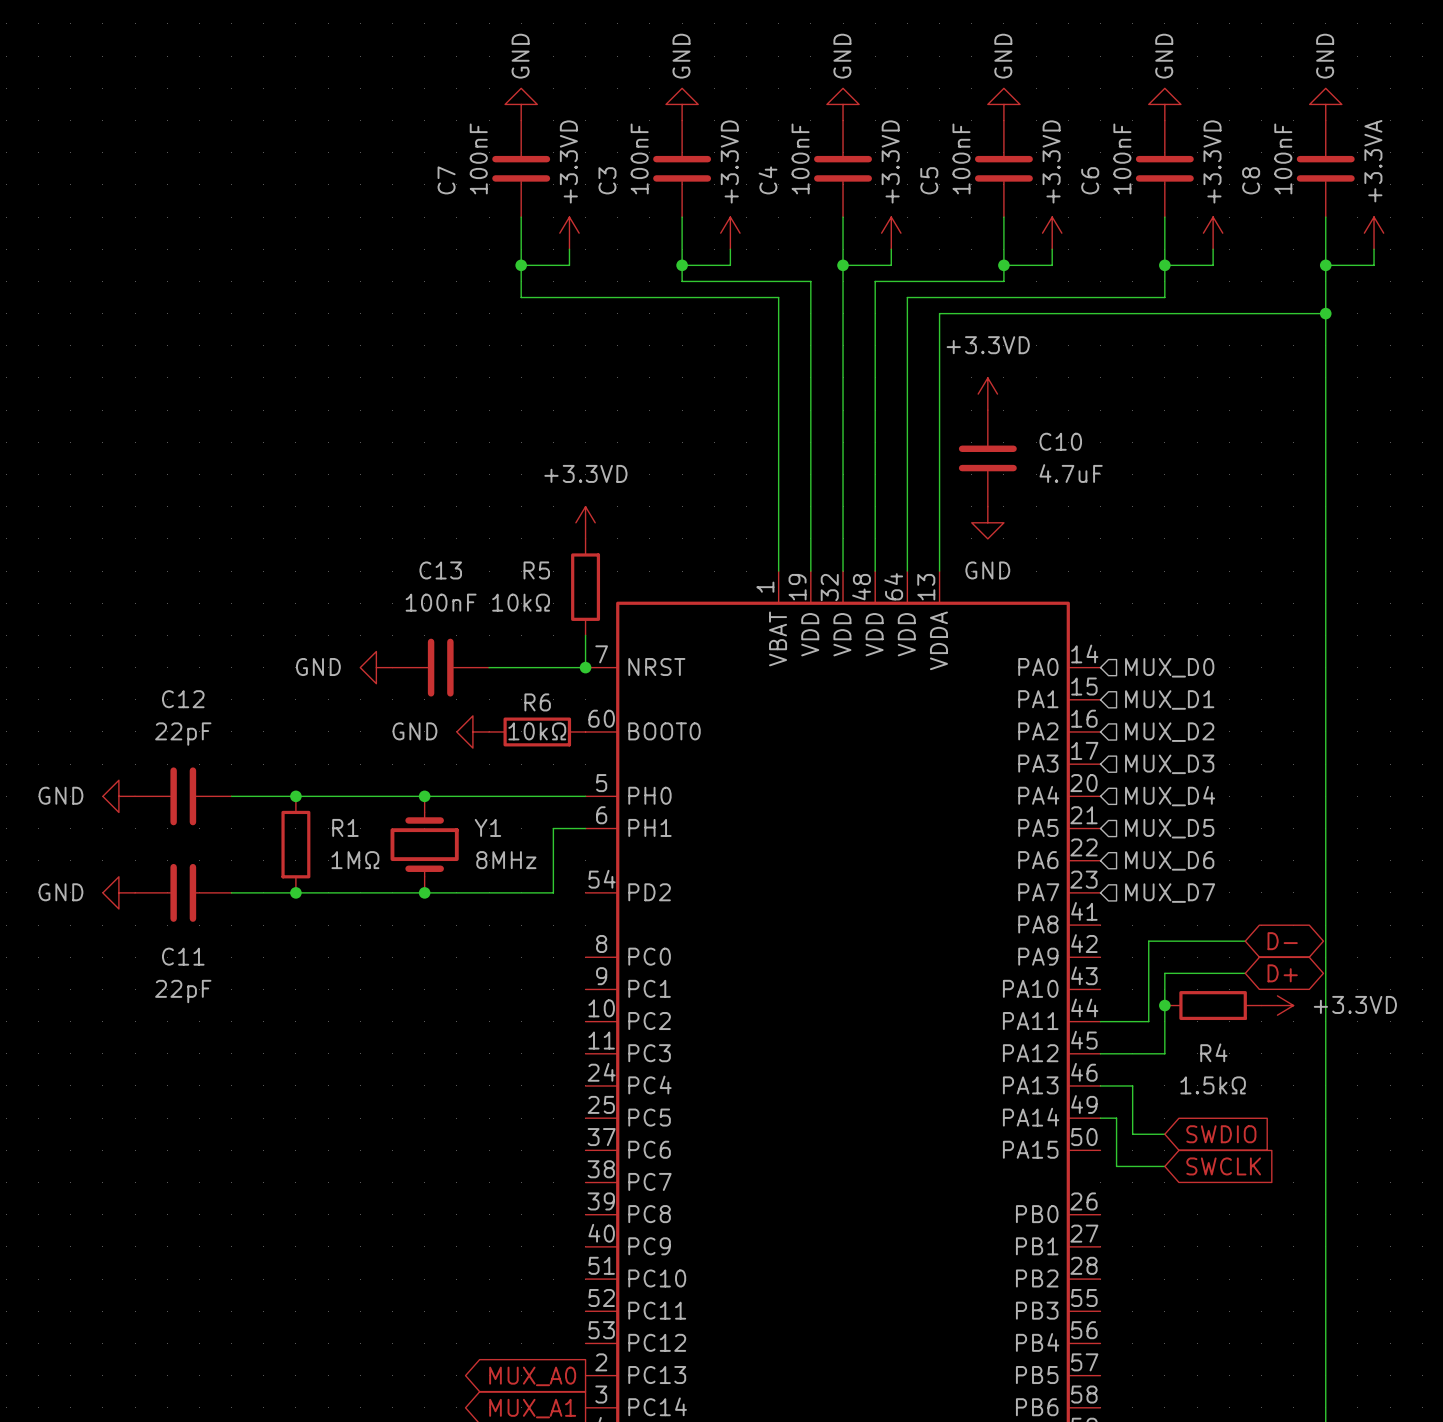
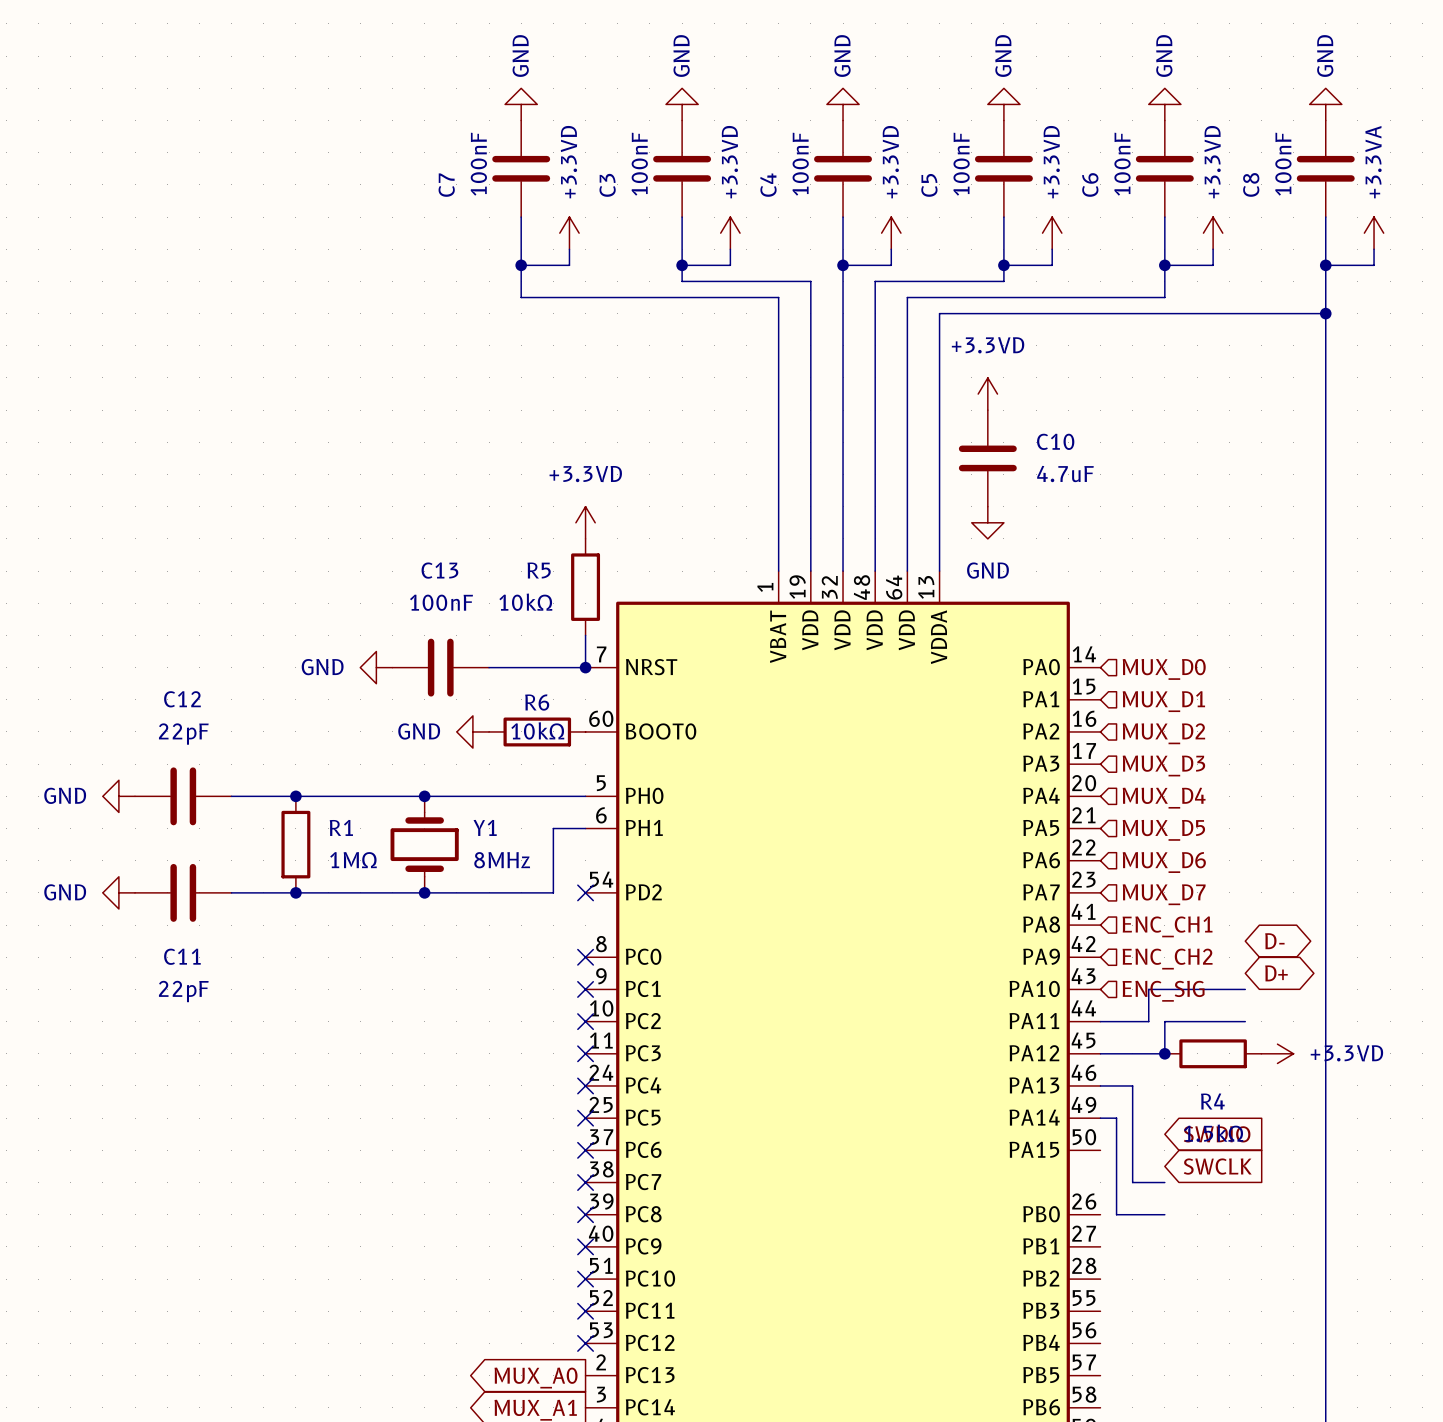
no-connect mark: none -> (585, 892)
hierarchical label: none -> ENC_CH1 (1167, 926)
wire: (1245, 941) (1148, 941) (1148, 989) -> (1245, 989) (1148, 989)
no-connect mark: none -> (585, 957)
hierarchical label: none -> ENC_CH2 (1167, 959)
wire: (1245, 973) (1164, 973) (1164, 1021) -> (1245, 1021) (1164, 1021)
no-connect mark: none -> (585, 989)
hierarchical label: none -> ENC_SIG (1163, 991)
junction position: (1164, 1005) -> (1164, 1053)
R4 position: (1213, 1005) -> (1213, 1053)
power symbol position: +3.3VD (1277, 1005) -> +3.3VD (1277, 1053)
no-connect mark: none -> (585, 1021)
no-connect mark: none -> (585, 1053)
no-connect mark: none -> (585, 1085)
no-connect mark: none -> (585, 1118)
wire: (1132, 1134) (1164, 1134) -> (1132, 1134) (1132, 1182) (1164, 1182)
no-connect mark: none -> (585, 1150)
wire: (1116, 1166) (1164, 1166) -> (1116, 1166) (1116, 1214) (1164, 1214)
no-connect mark: none -> (585, 1182)
no-connect mark: none -> (585, 1214)
no-connect mark: none -> (585, 1246)
no-connect mark: none -> (585, 1279)
no-connect mark: none -> (585, 1311)
no-connect mark: none -> (585, 1343)

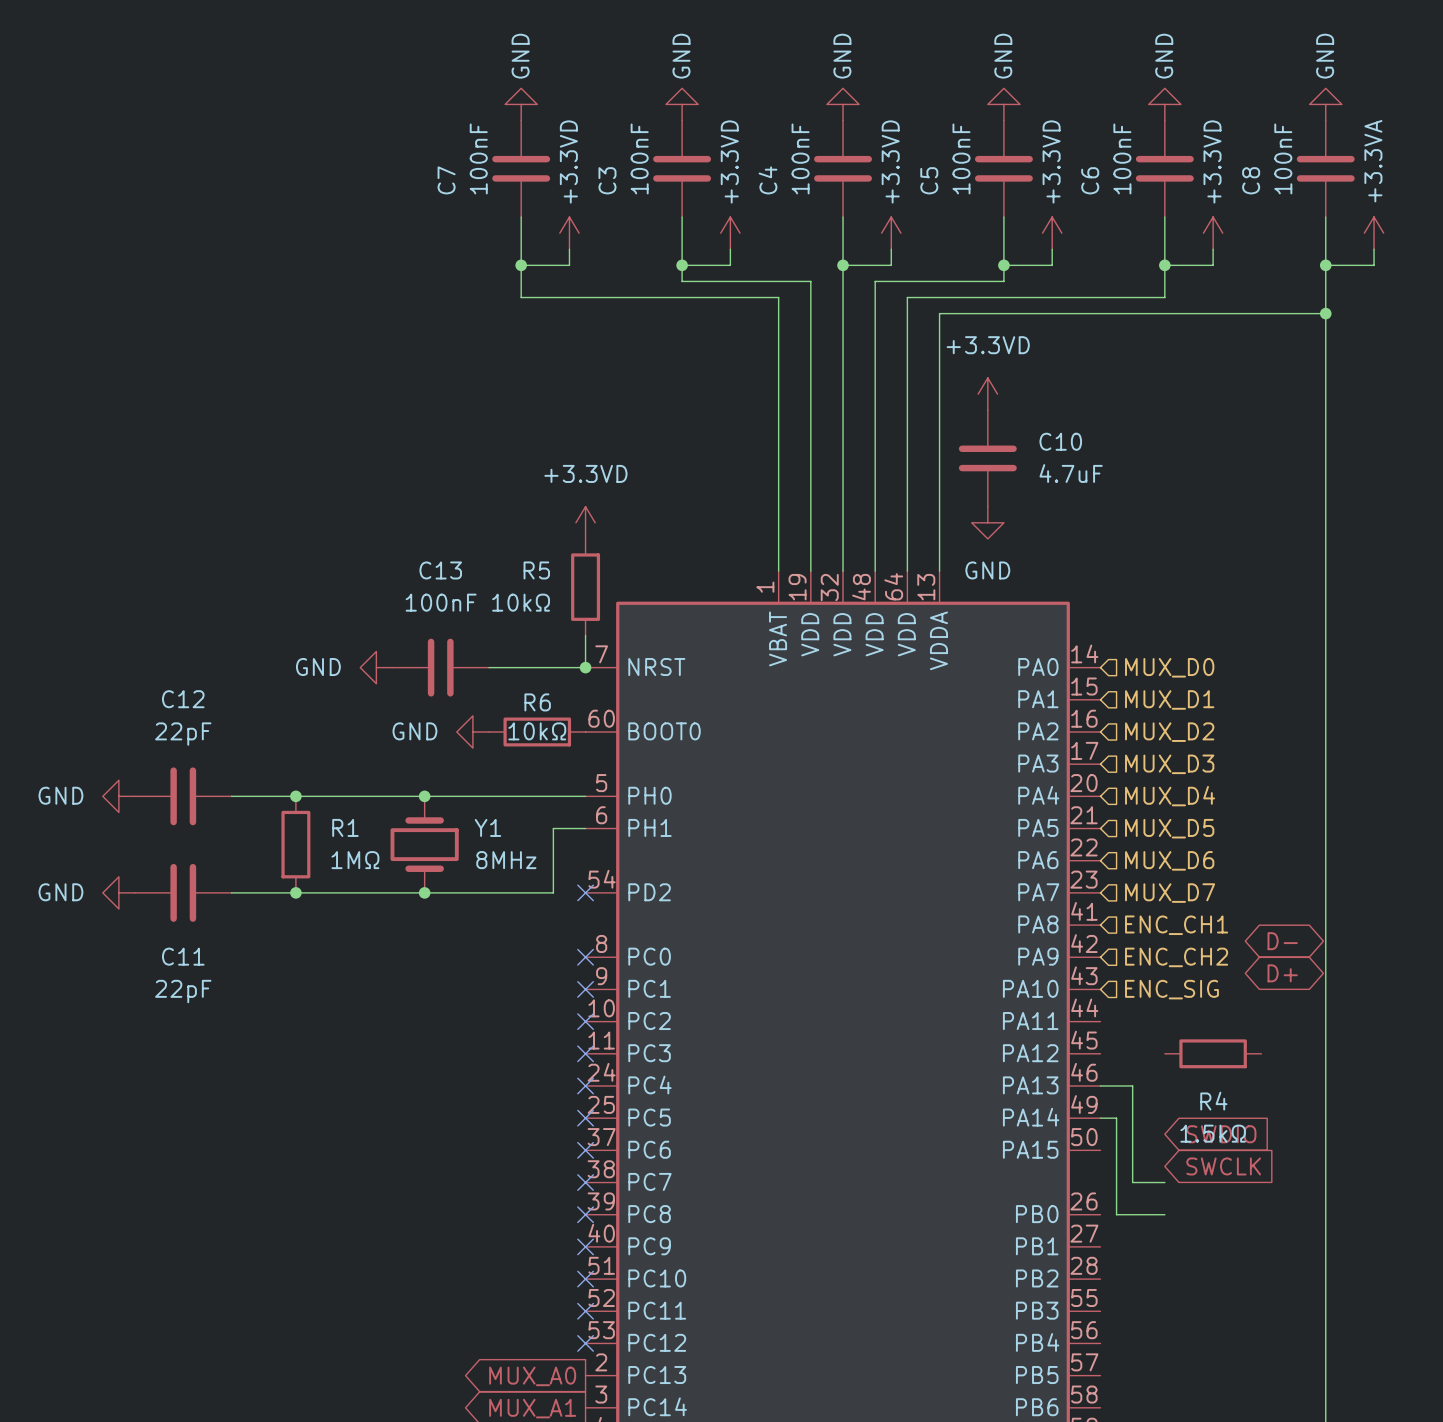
wire: (1245, 989) (1148, 989) (1148, 1021) (1100, 1021) -> none
wire: (1245, 1021) (1164, 1021) (1164, 1053) (1100, 1053) -> none
junction: (1164, 1053) -> none
power symbol: +3.3VD (1277, 1053) -> none

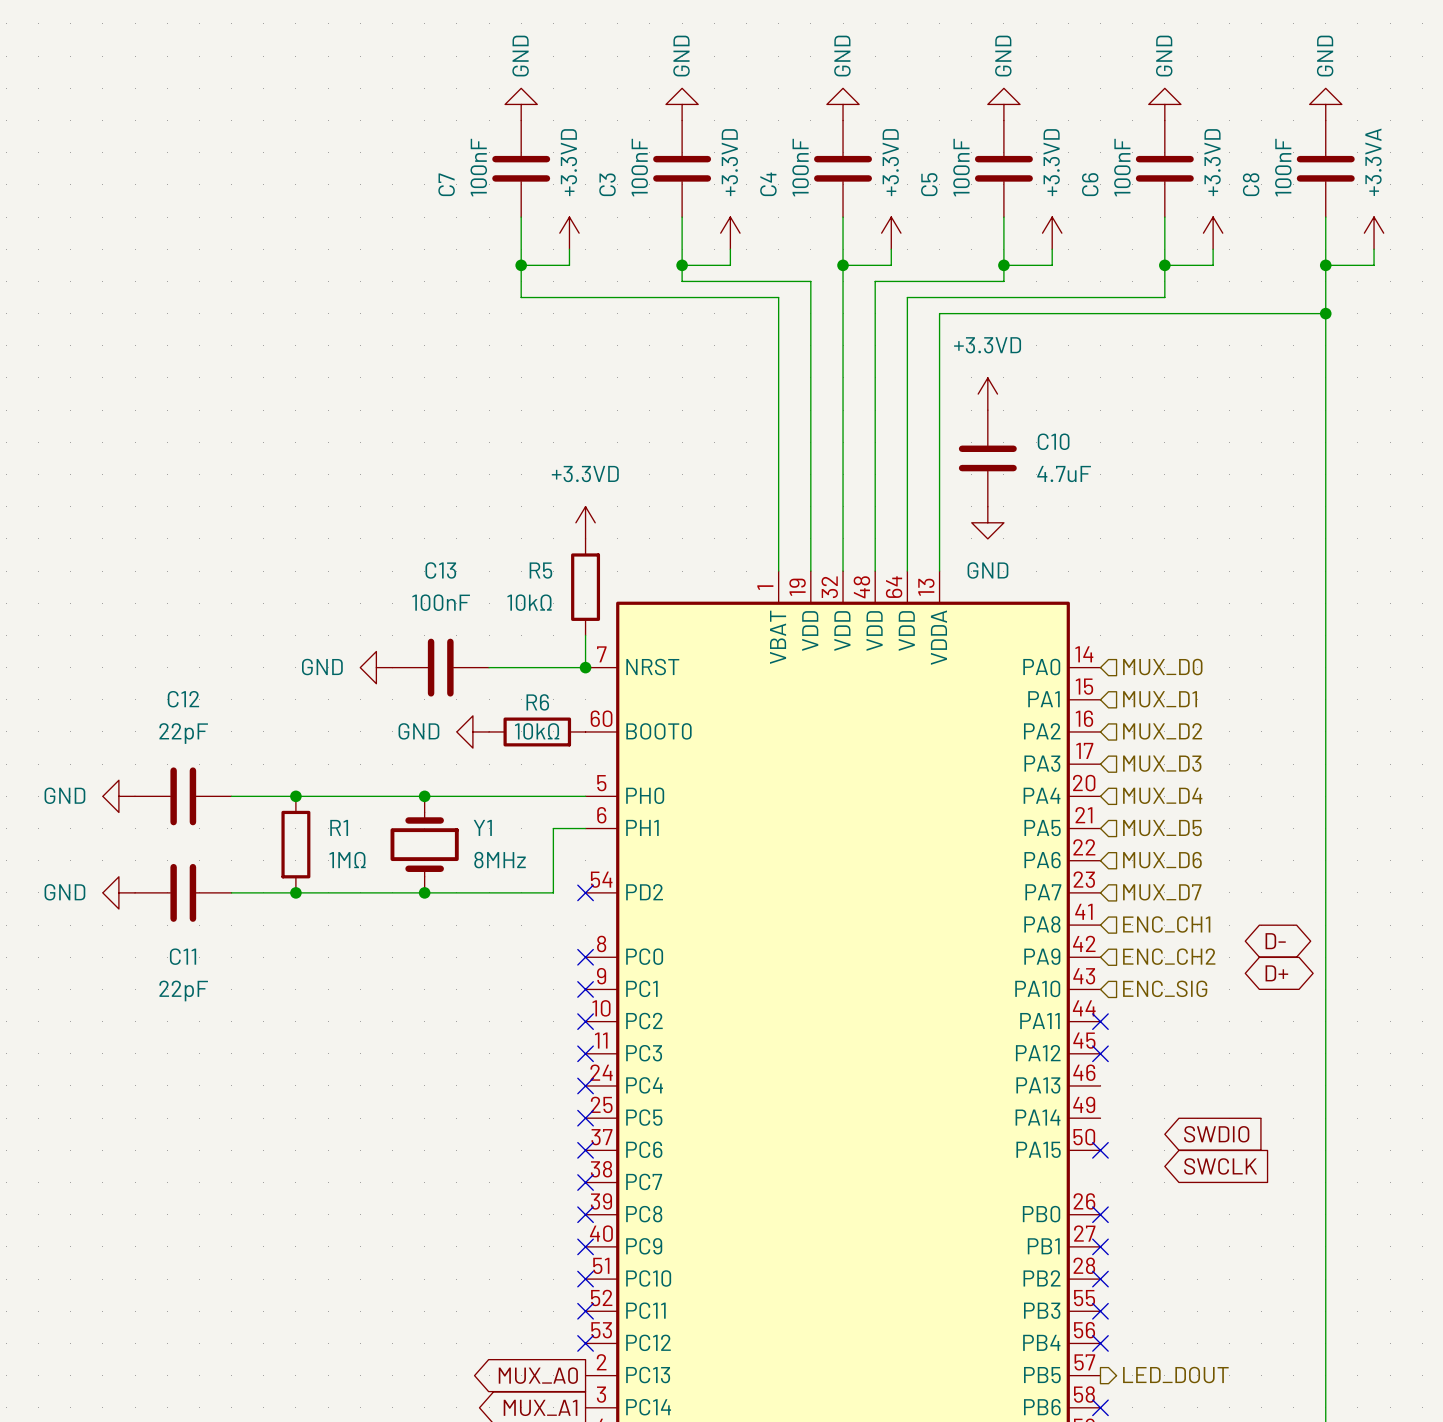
no-connect mark: none -> (1100, 1021)
no-connect mark: none -> (1100, 1053)
R4: 1.5kΩ (1213, 1053) -> none
wire: (1100, 1085) (1132, 1085) (1132, 1182) (1164, 1182) -> none
wire: (1100, 1118) (1116, 1118) (1116, 1214) (1164, 1214) -> none
no-connect mark: none -> (1100, 1150)
no-connect mark: none -> (1100, 1214)
no-connect mark: none -> (1100, 1246)
no-connect mark: none -> (1100, 1279)
no-connect mark: none -> (1100, 1311)
no-connect mark: none -> (1100, 1343)
hierarchical label: none -> LED_DOUT (1175, 1375)
no-connect mark: none -> (1100, 1407)

